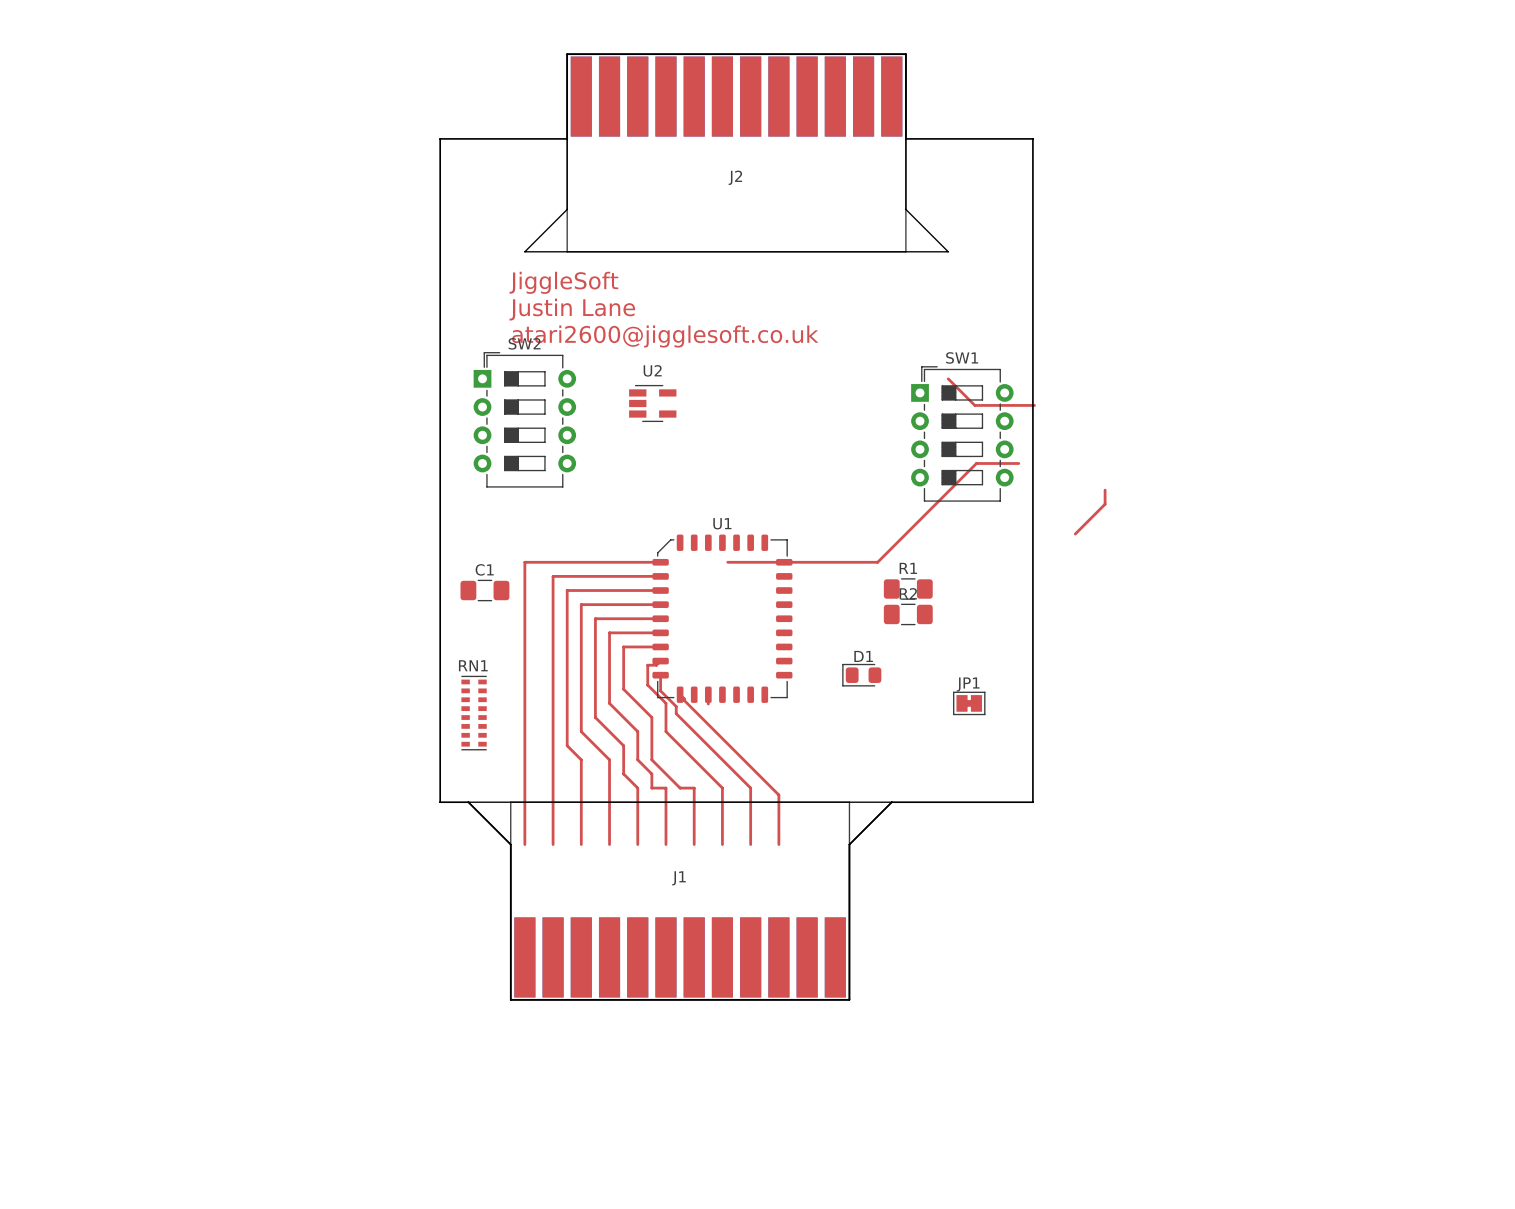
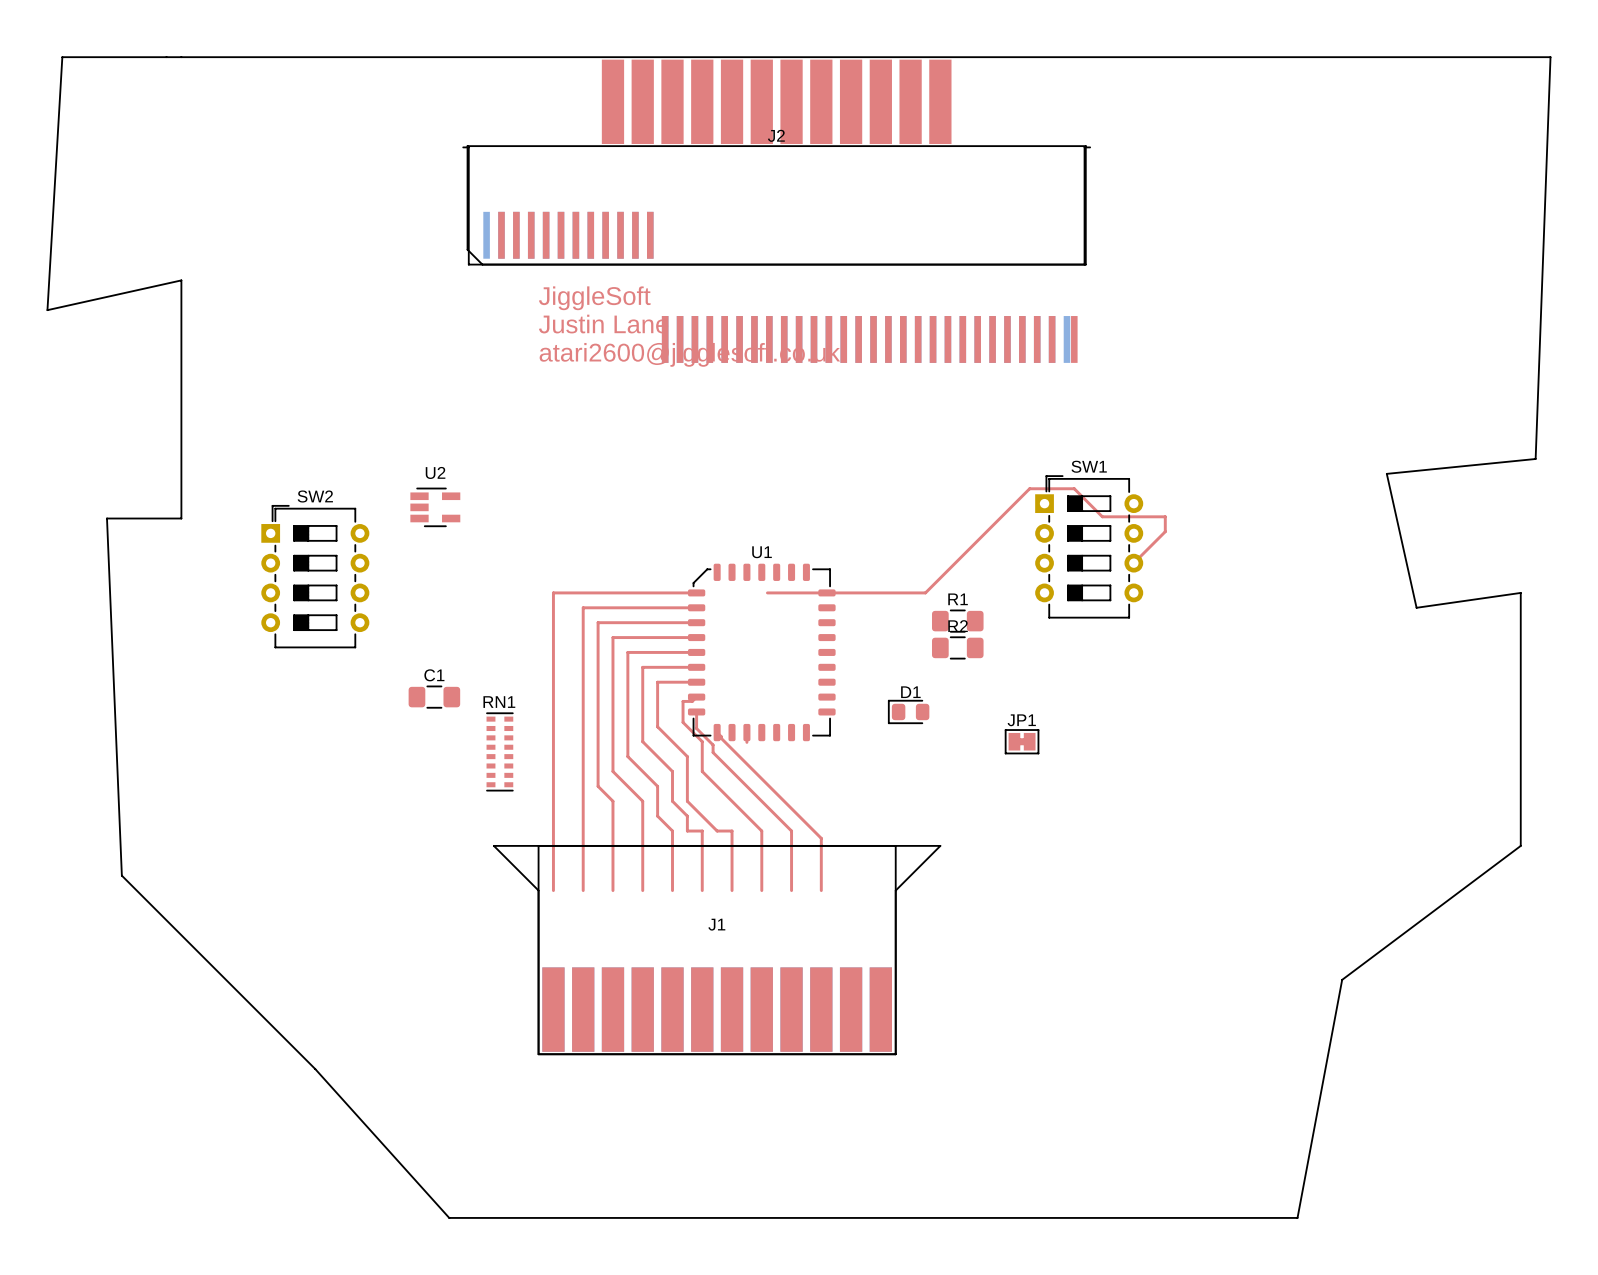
J2 footprint: [524, 53, 949, 253] -> [462, 59, 1091, 363]
board edge: (567, 54) (567, 138) (440, 138) (440, 802) (468, 802) (510, 844) (510, 999) (849, 999) (849, 844) (891, 802) (1032, 802) (1032, 138) (905, 138) (905, 54) -> (598, 57) (62, 57) (47, 310) (181, 280) (181, 518) (106, 518) (121, 875) (315, 1069) (449, 1217) (1297, 1217) (1342, 979) (1520, 845) (1520, 592) (1416, 607) (1386, 473) (1535, 458) (1550, 57) (955, 57)
J2 name position: J2 (735, 177) -> J2 (776, 135)
top track: (948, 378) (974, 405) (1034, 405) -> (1074, 488) (1102, 516) (1165, 516)
U2 position: (652, 403) -> (435, 507)
SW2 position: (524, 419) -> (315, 576)
SW1 position: (962, 433) -> (1089, 546)
C1 position: (484, 590) -> (434, 697)

